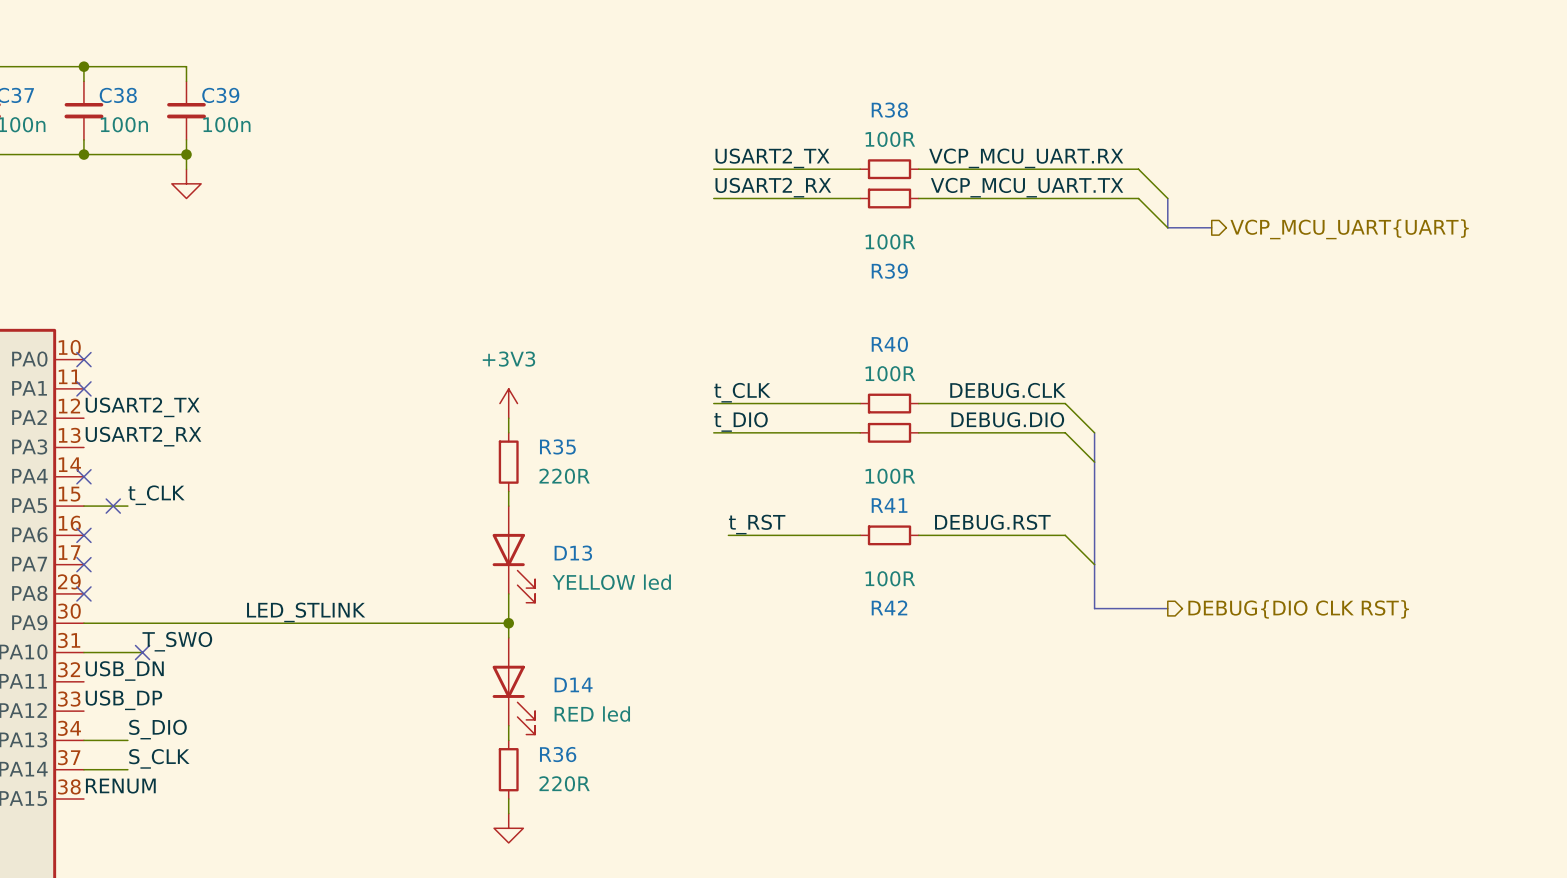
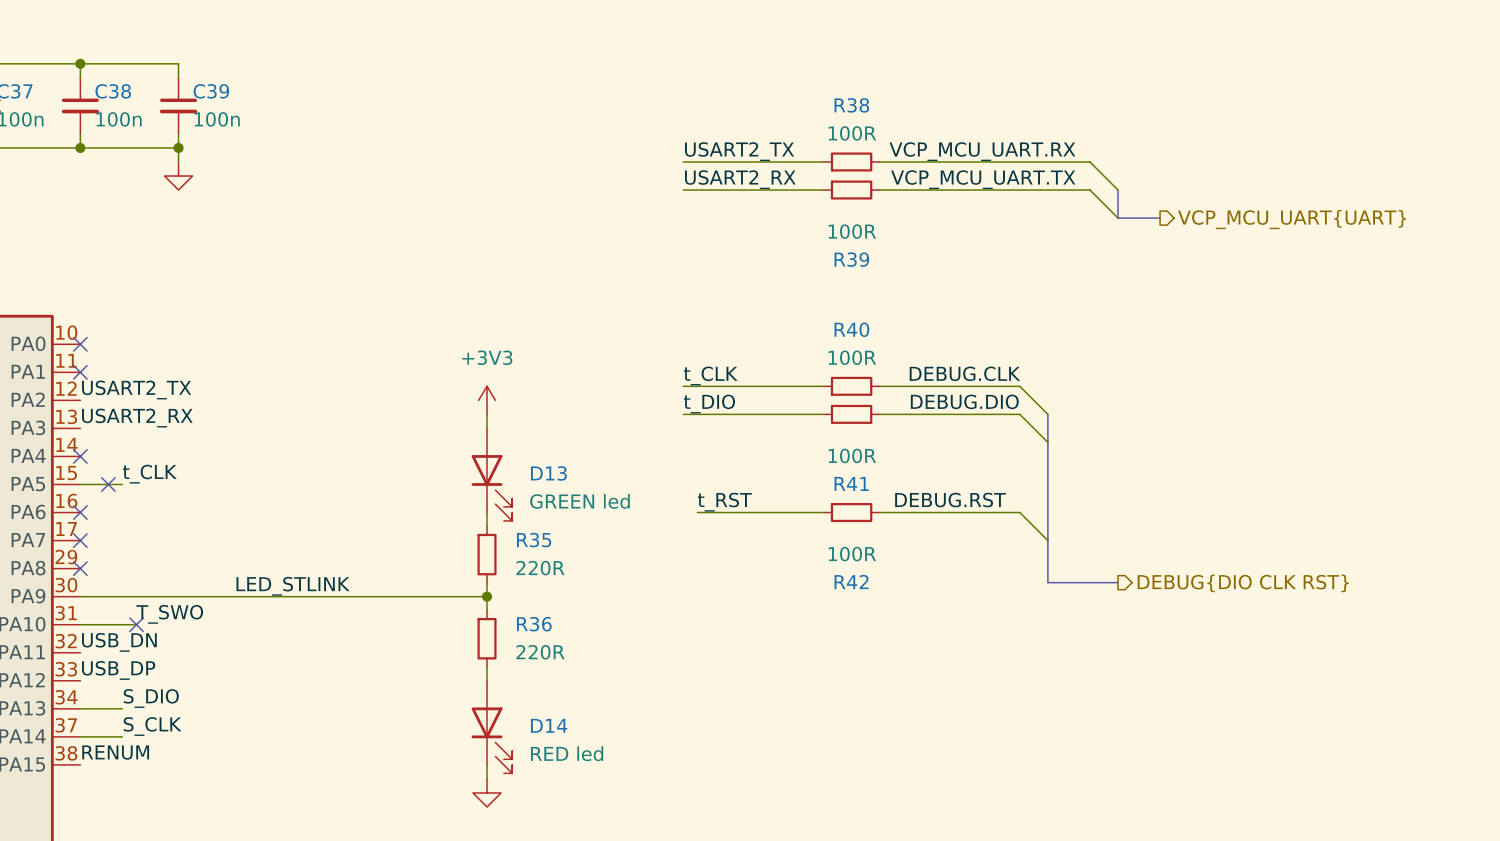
power symbol position: +3V3 (508, 403) -> +3V3 (487, 400)
R35 position: (508, 462) -> (487, 554)
D13 position: (513, 554) -> (491, 474)
D13 value: YELLOW led (611, 582) -> GREEN led (579, 501)
D14 position: (513, 686) -> (491, 727)
R36 position: (508, 769) -> (487, 638)

